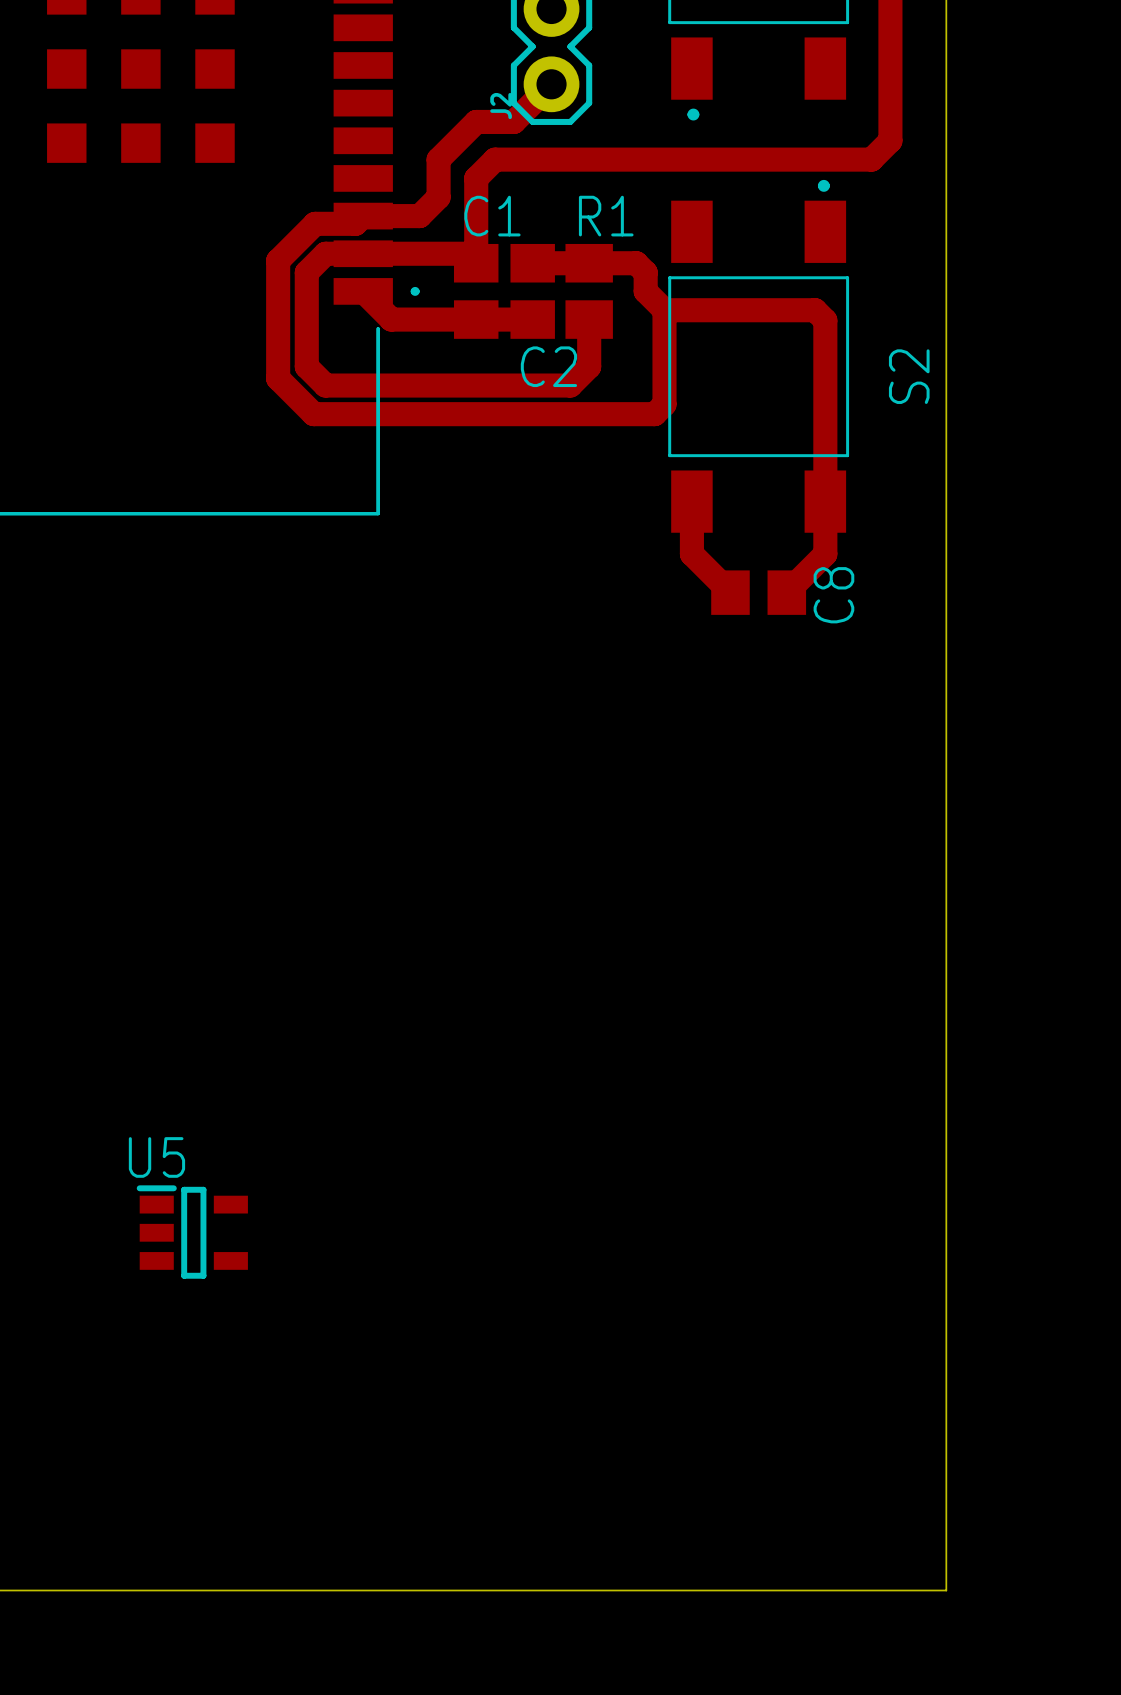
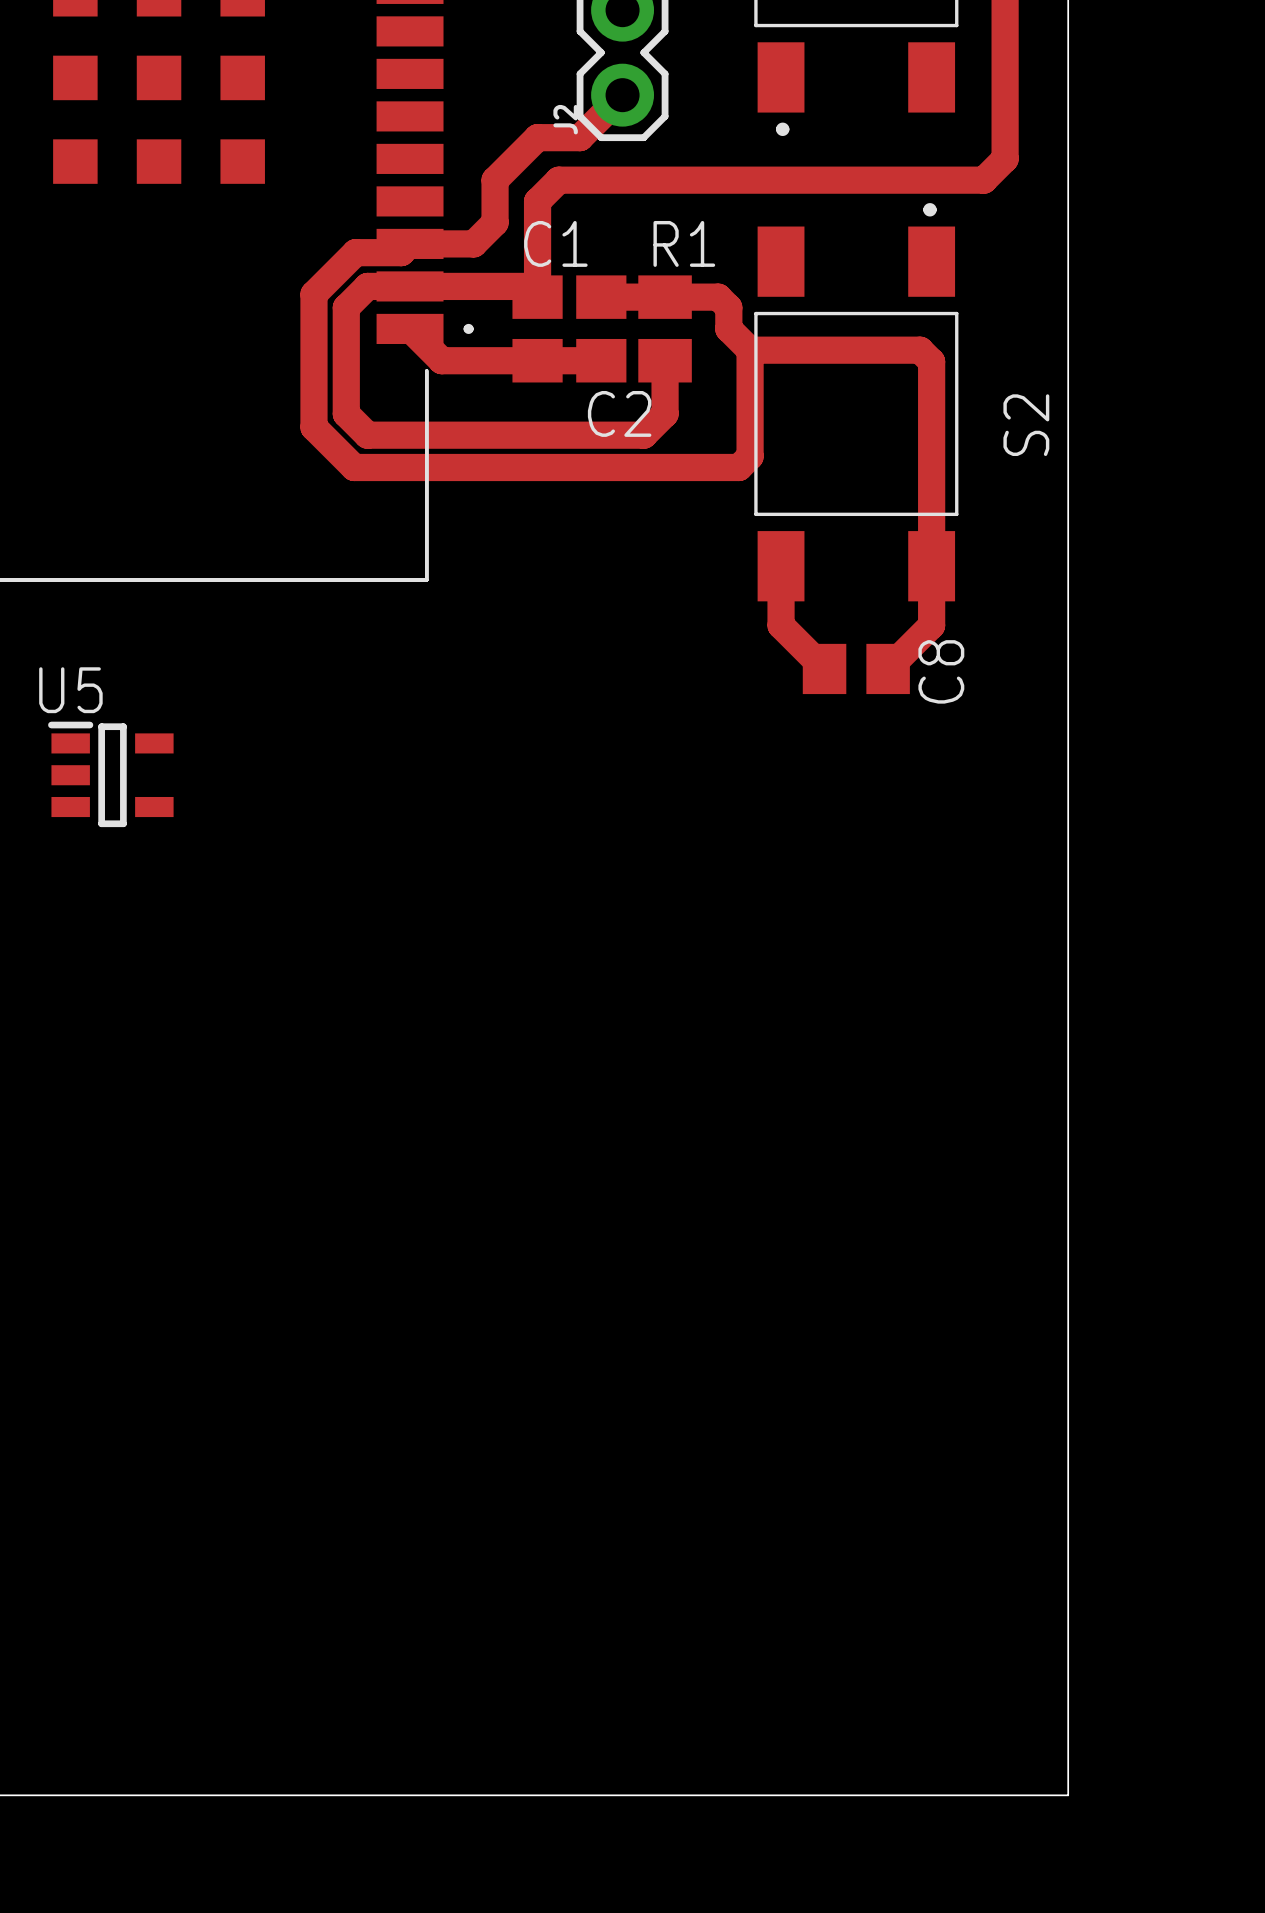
U5 position: (192, 1232) -> (110, 774)

